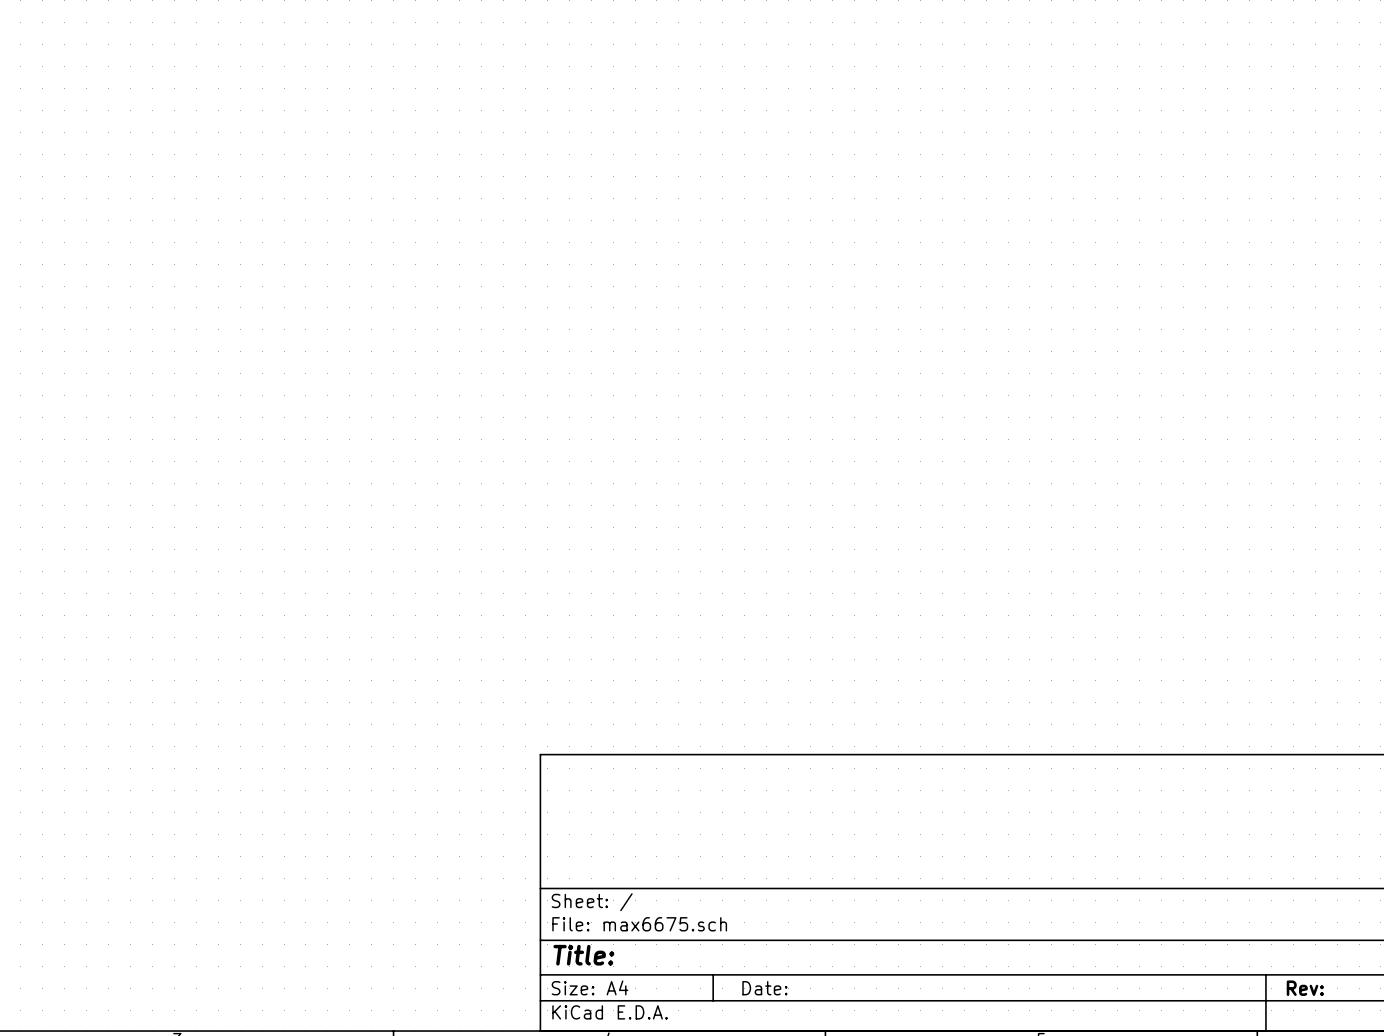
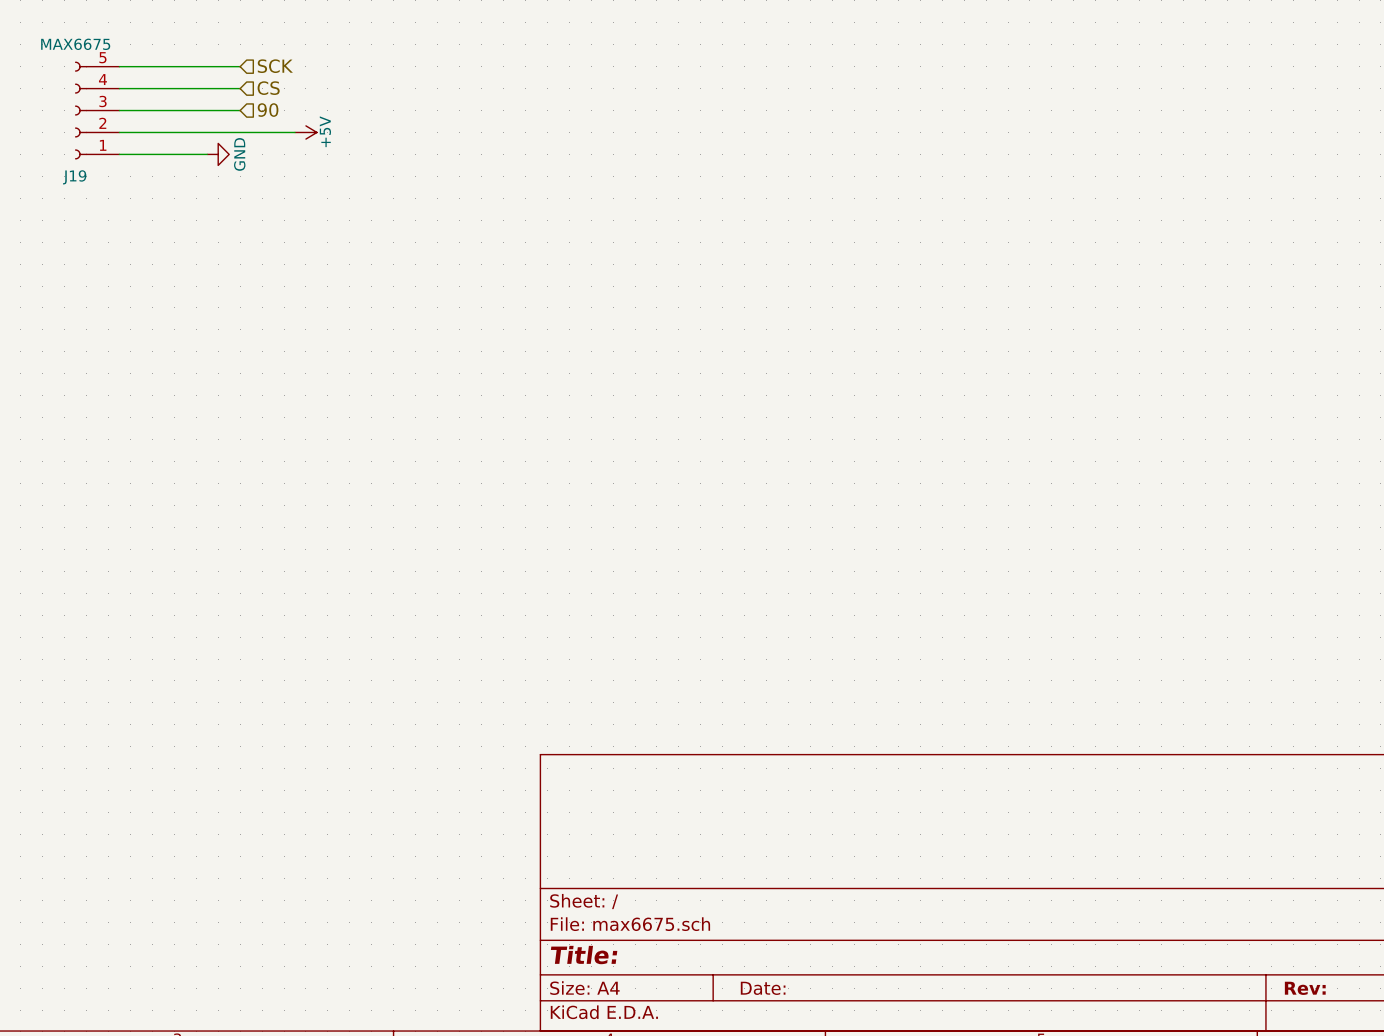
wire: none -> (119, 66) (240, 66)
hierarchical label: none -> SCK (275, 66)
wire: none -> (119, 88) (240, 88)
hierarchical label: none -> CS (268, 88)
J19: none -> MAX6675 (97, 110)
wire: none -> (119, 110) (240, 110)
hierarchical label: none -> 90 (268, 110)
wire: none -> (119, 132) (294, 132)
power symbol: none -> +5V (305, 132)
wire: none -> (119, 154) (207, 154)
power symbol: none -> GND (218, 154)

